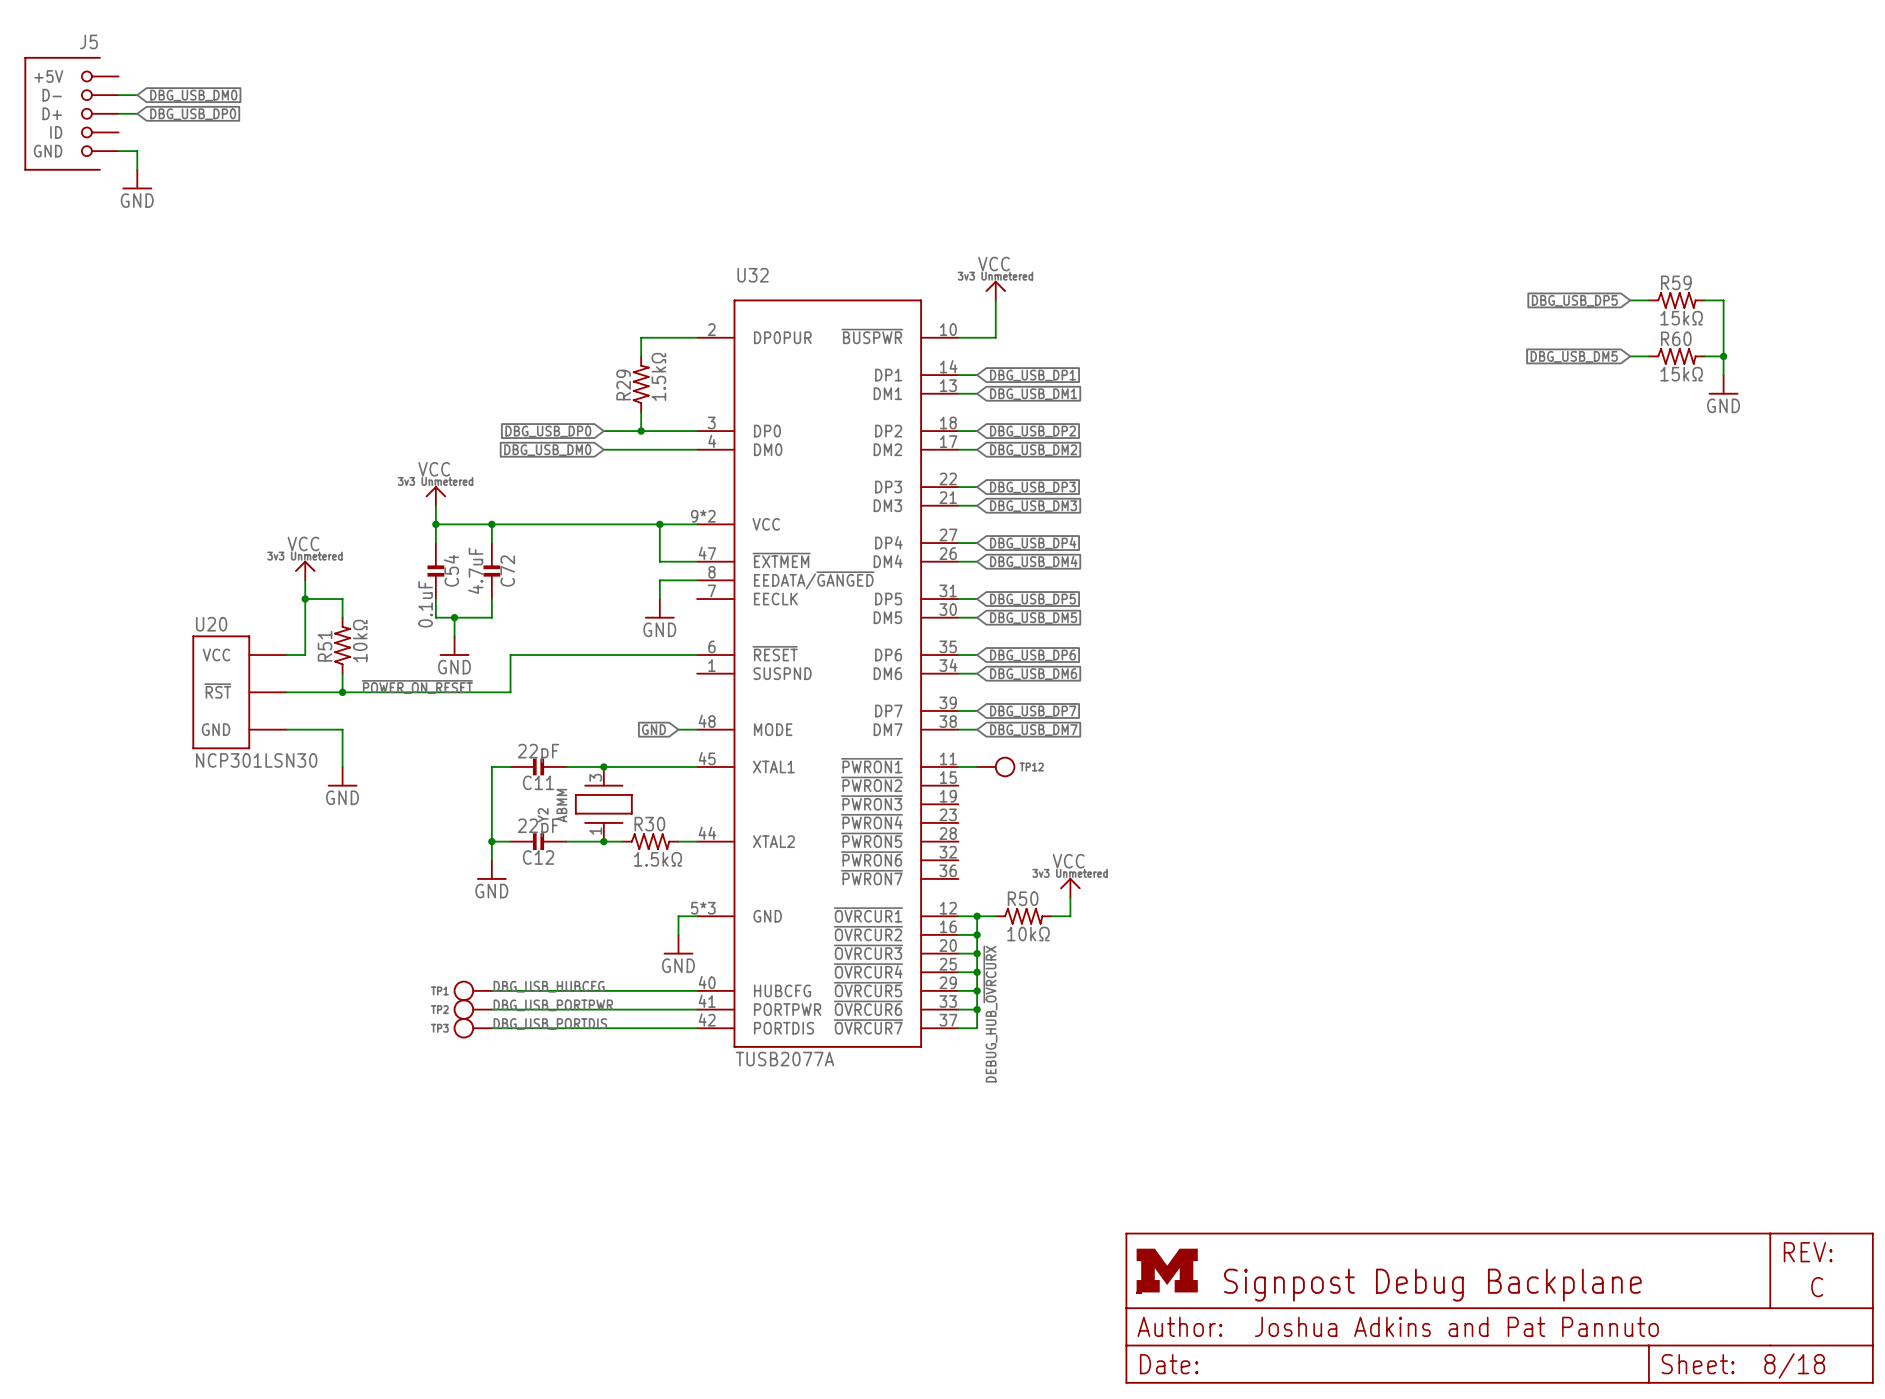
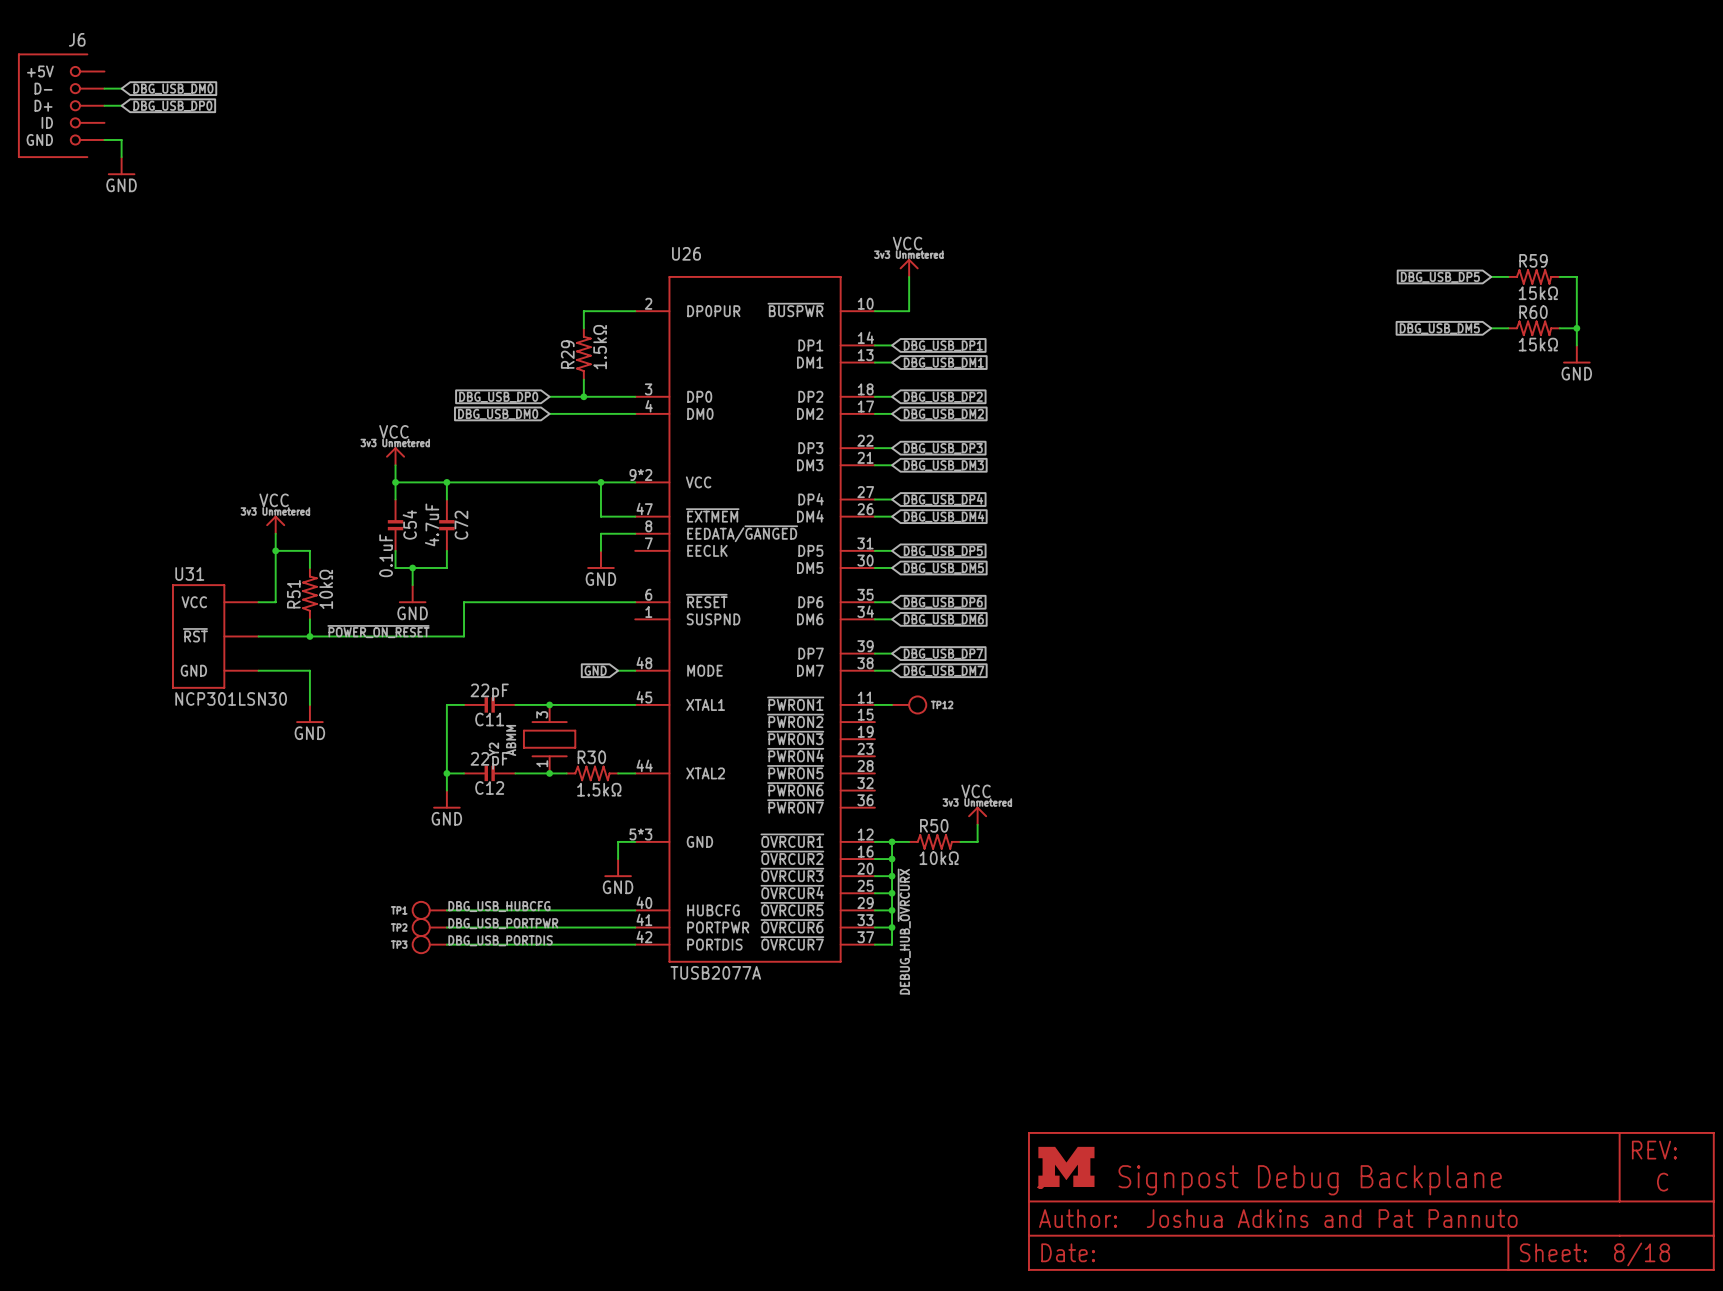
J5 name: J5 (88, 41) -> J6 (77, 39)
U32 name: U32 (753, 275) -> U26 (686, 253)
U20 name: U20 (211, 624) -> U31 (189, 573)

